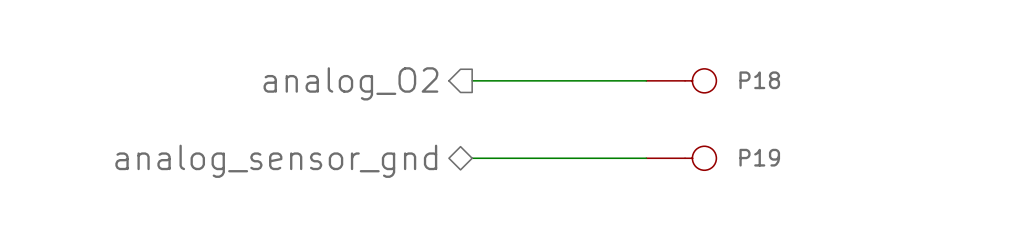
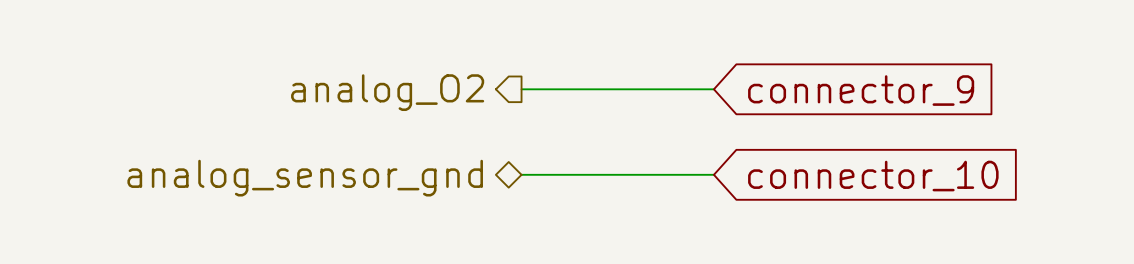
P18: (681, 80) -> none
global label: none -> connector_9 (861, 90)
P19: (681, 158) -> none
global label: none -> connector_10 (873, 176)

